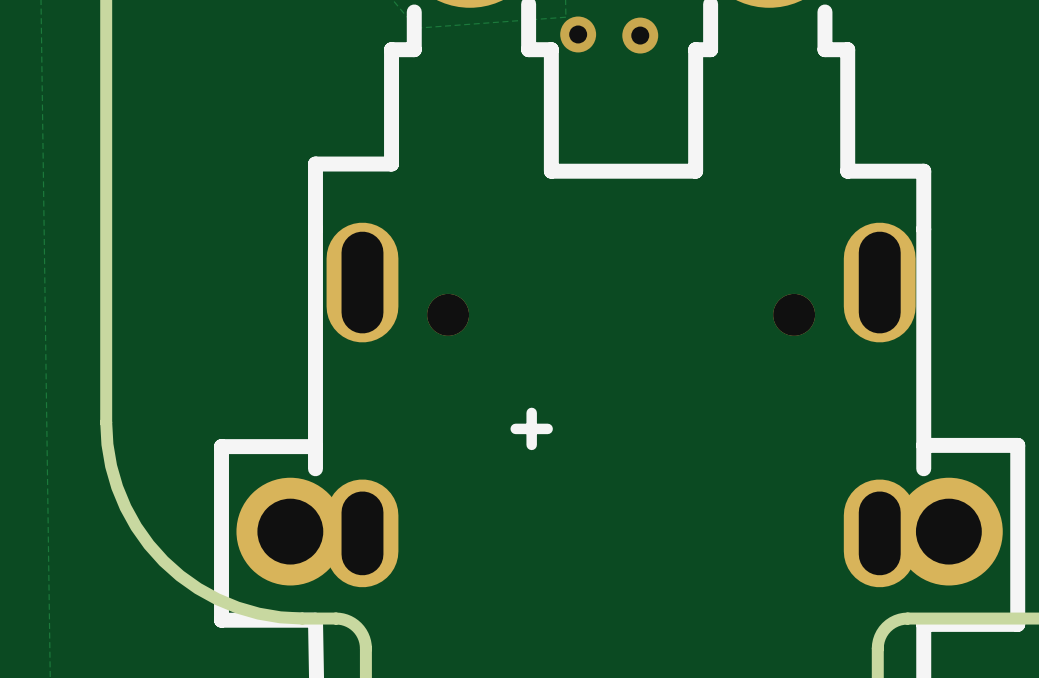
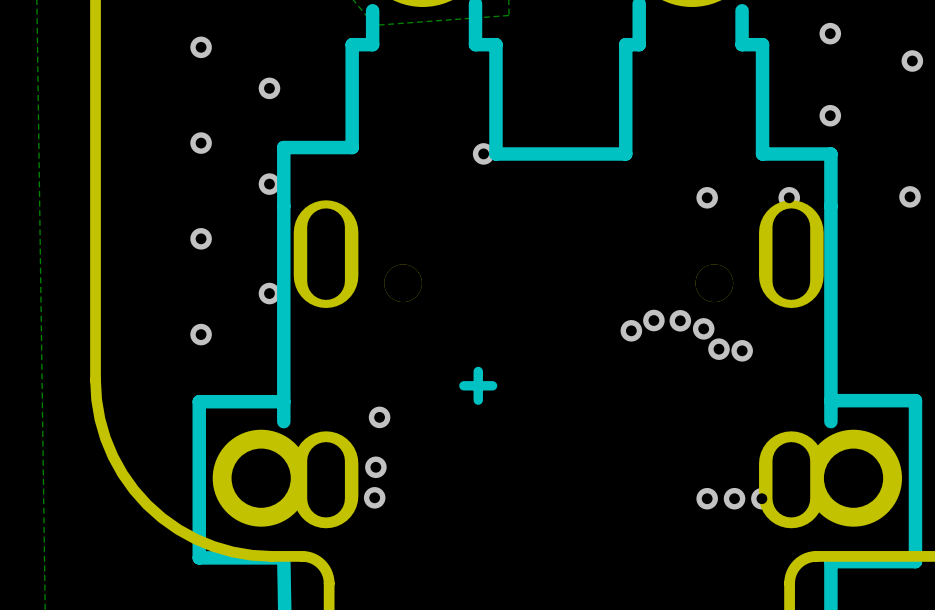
via: (578, 34) -> none
via: (640, 35) -> none
via: none -> (830, 33)
via: none -> (201, 47)
via: none -> (912, 61)
via: none -> (269, 88)
via: none -> (830, 115)
via: none -> (201, 143)
via: none -> (483, 153)
via: none -> (269, 184)
via: none -> (910, 196)
via: none -> (707, 197)
via: none -> (789, 197)
via: none -> (201, 238)
via: none -> (269, 293)
via: none -> (653, 320)
via: none -> (680, 320)
via: none -> (703, 328)
via: none -> (631, 330)
via: none -> (201, 334)
via: none -> (718, 349)
via: none -> (742, 350)
via: none -> (379, 417)
via: none -> (375, 467)
via: none -> (374, 497)
via: none -> (707, 498)
via: none -> (734, 498)
via: none -> (761, 498)

